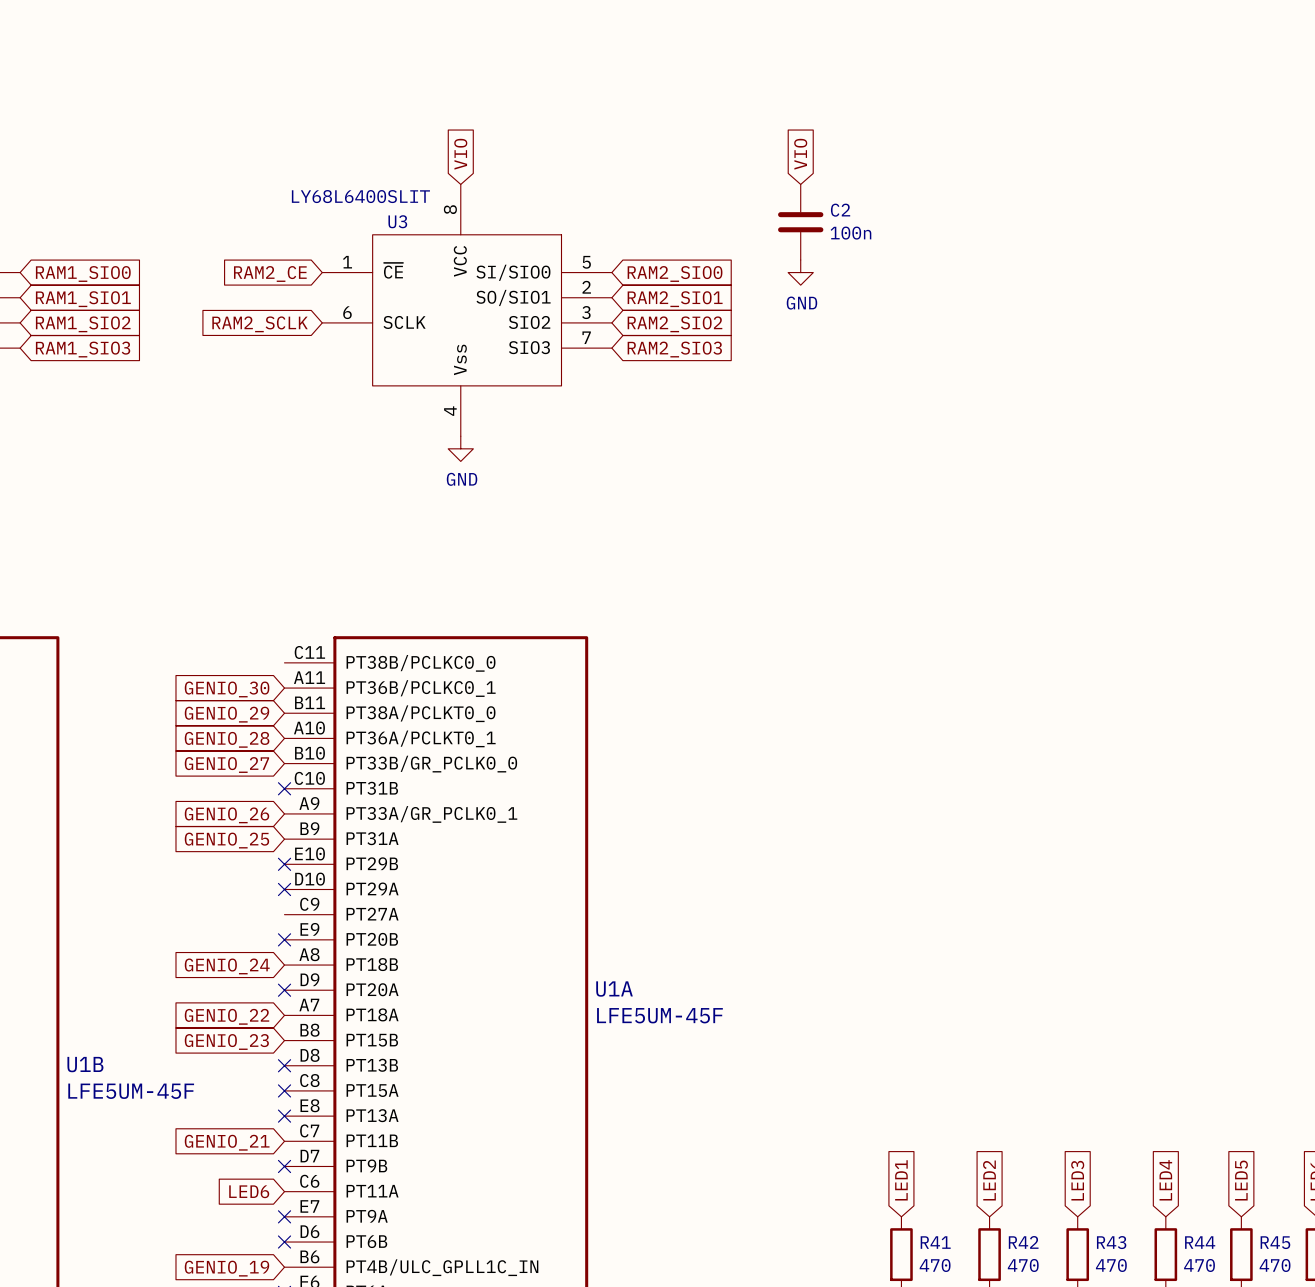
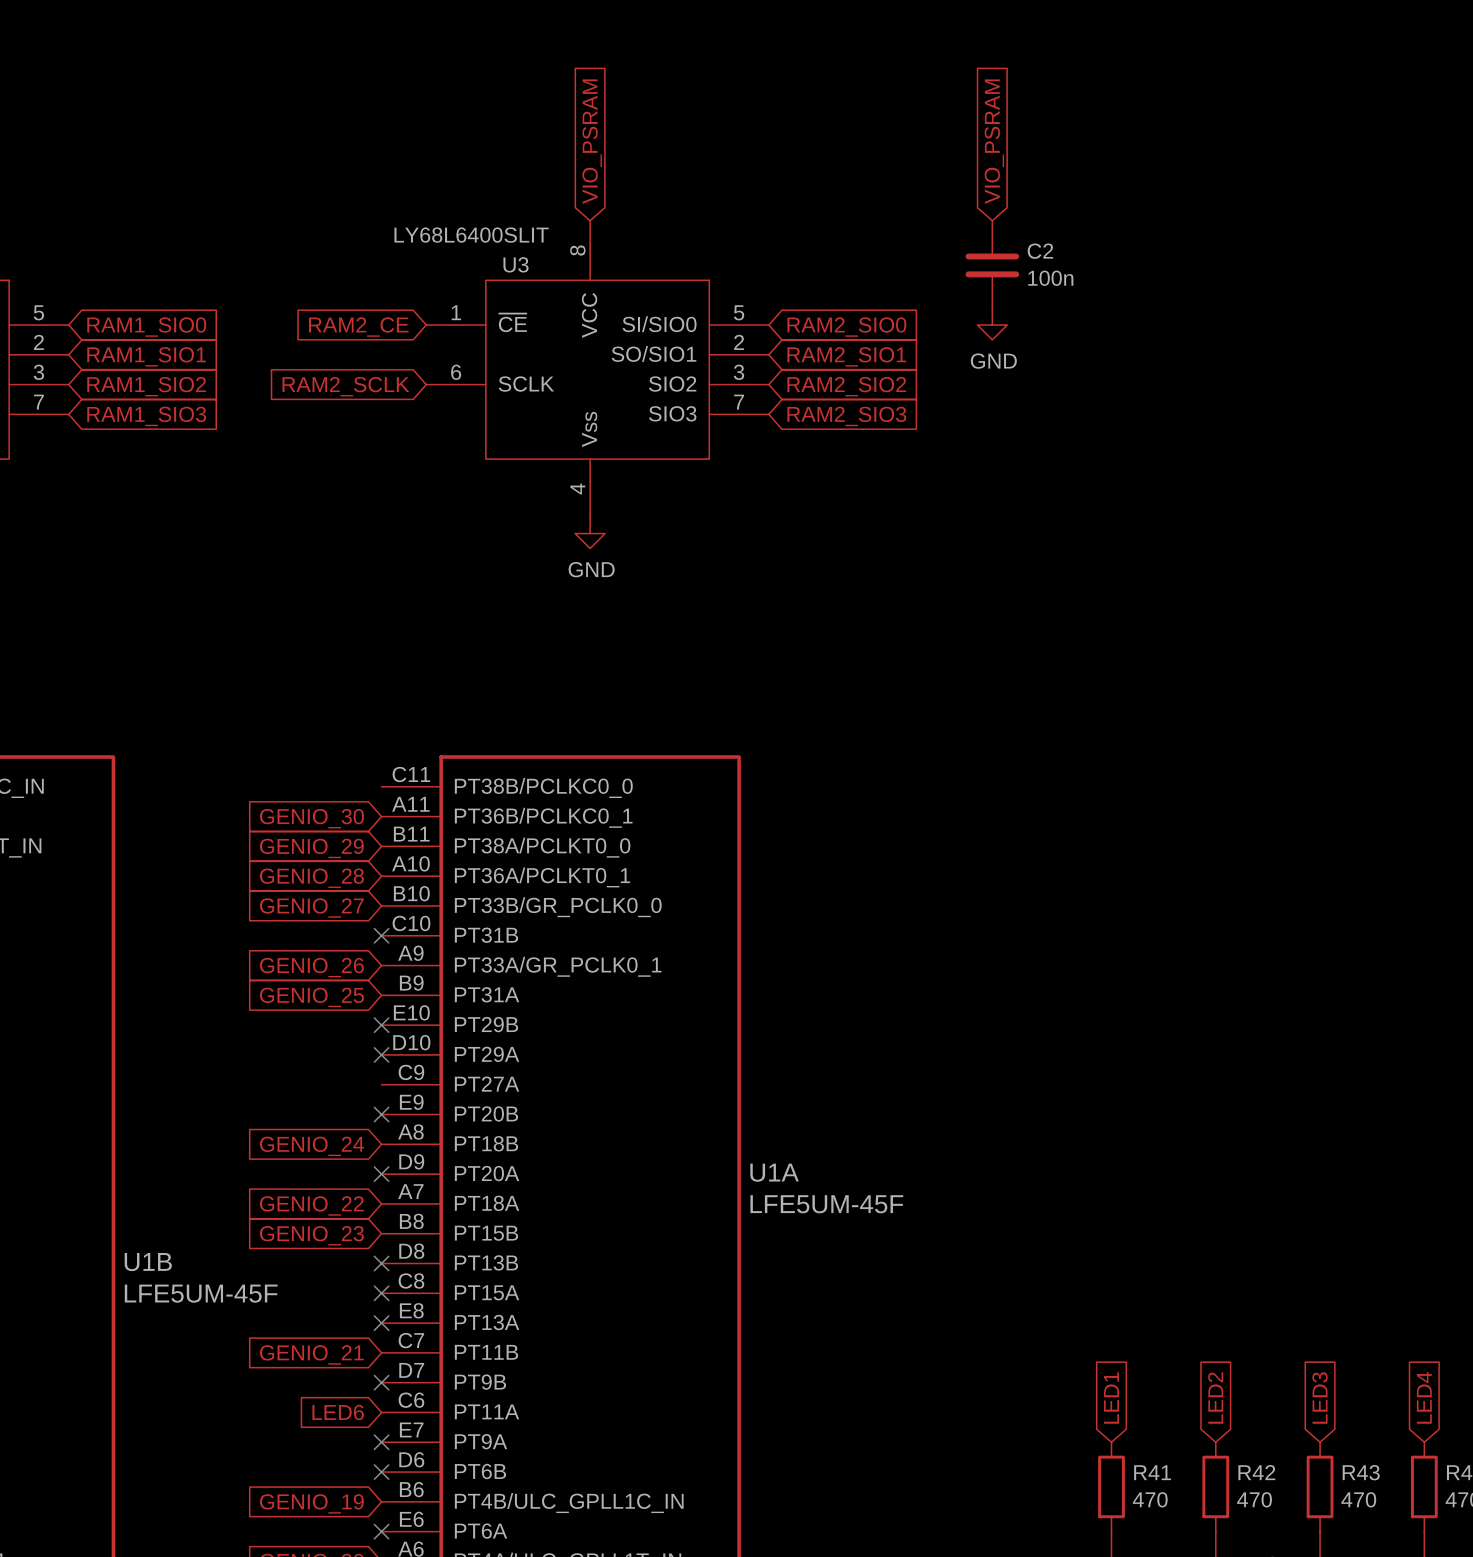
global label: VIO (460, 154) -> VIO_PSRAM (592, 141)
global label: VIO (800, 154) -> VIO_PSRAM (994, 141)

